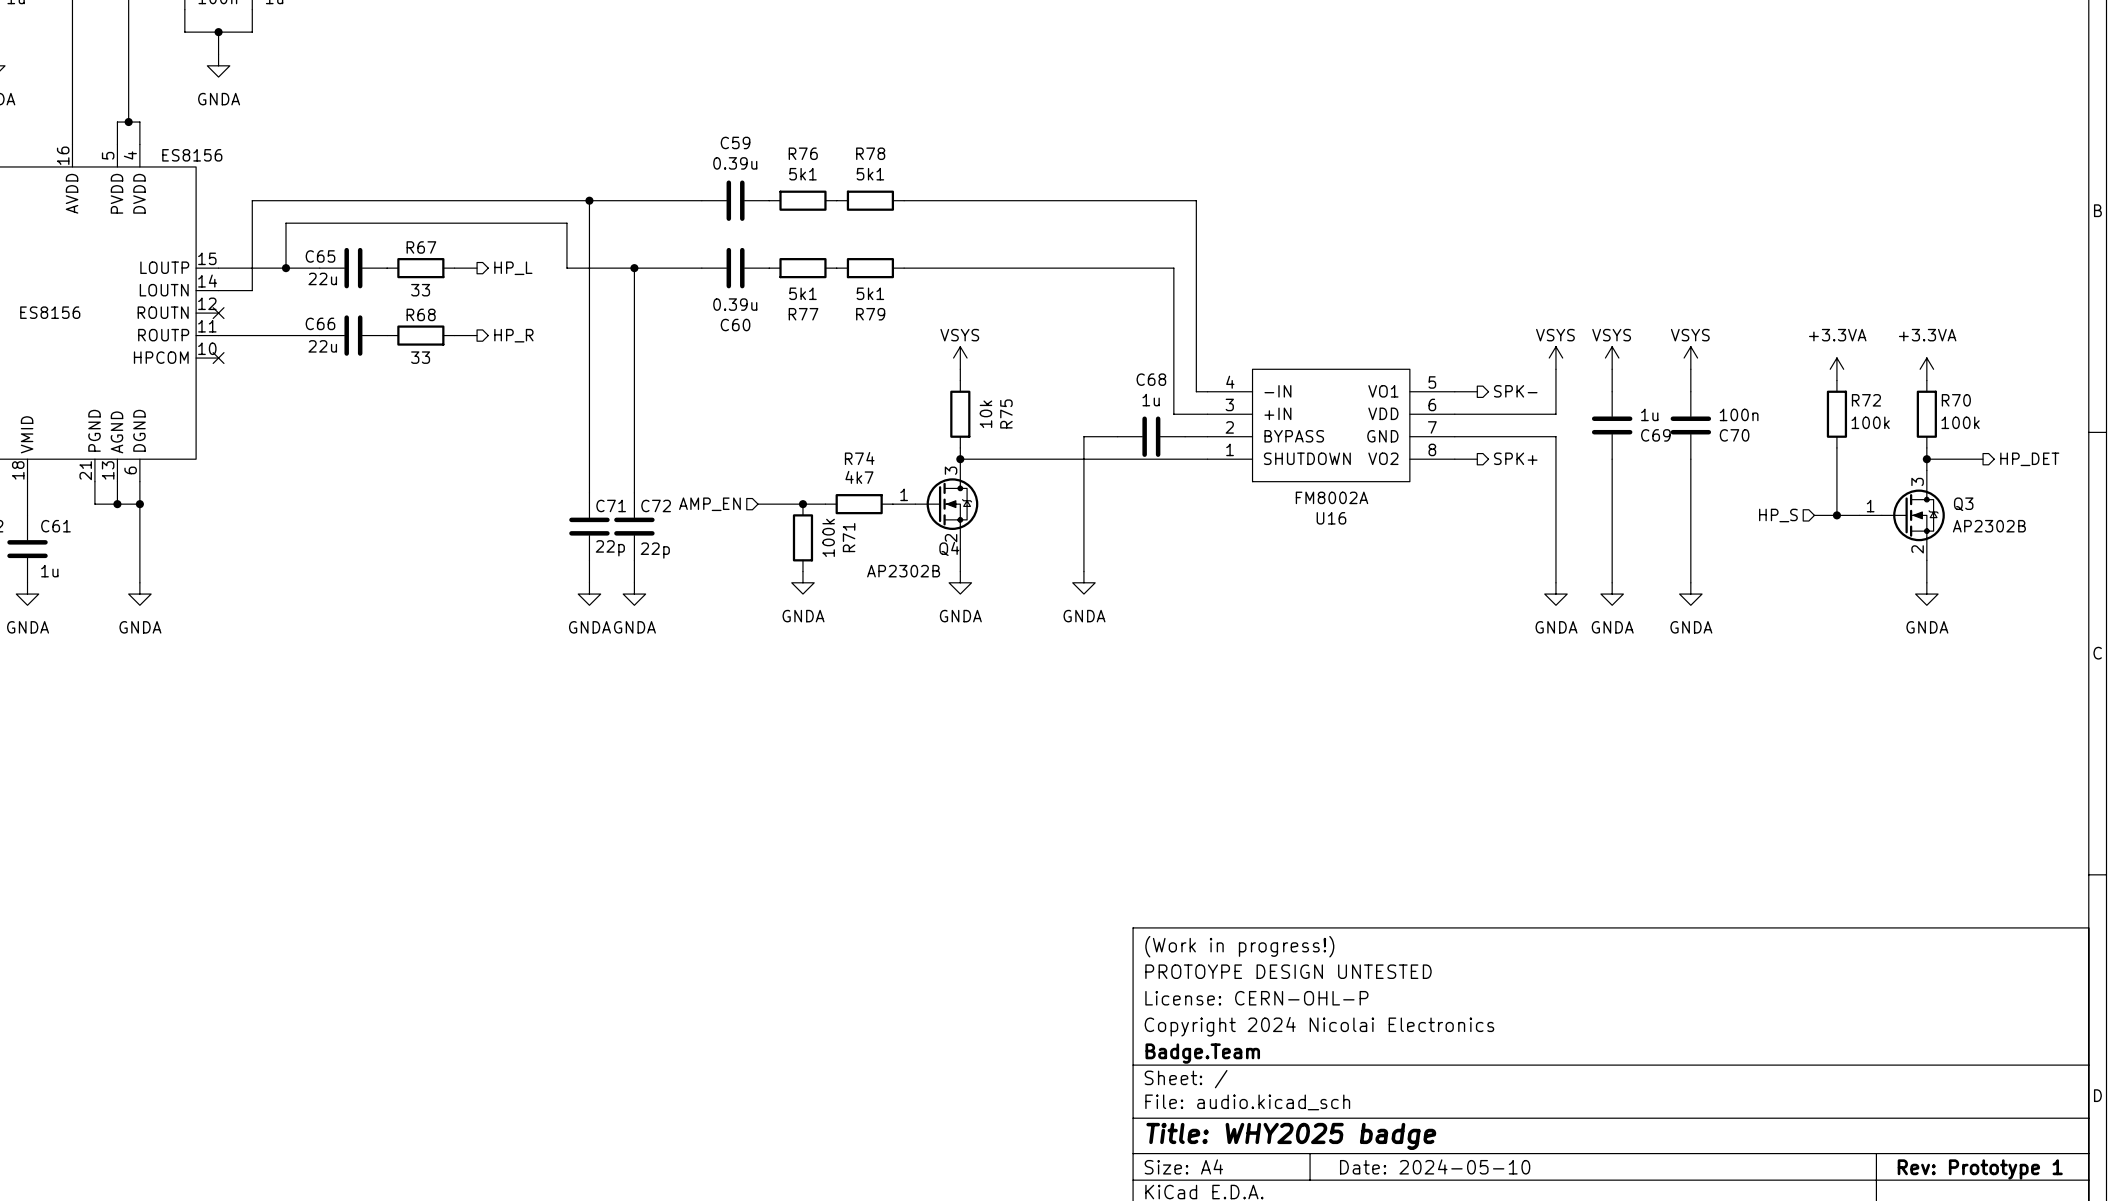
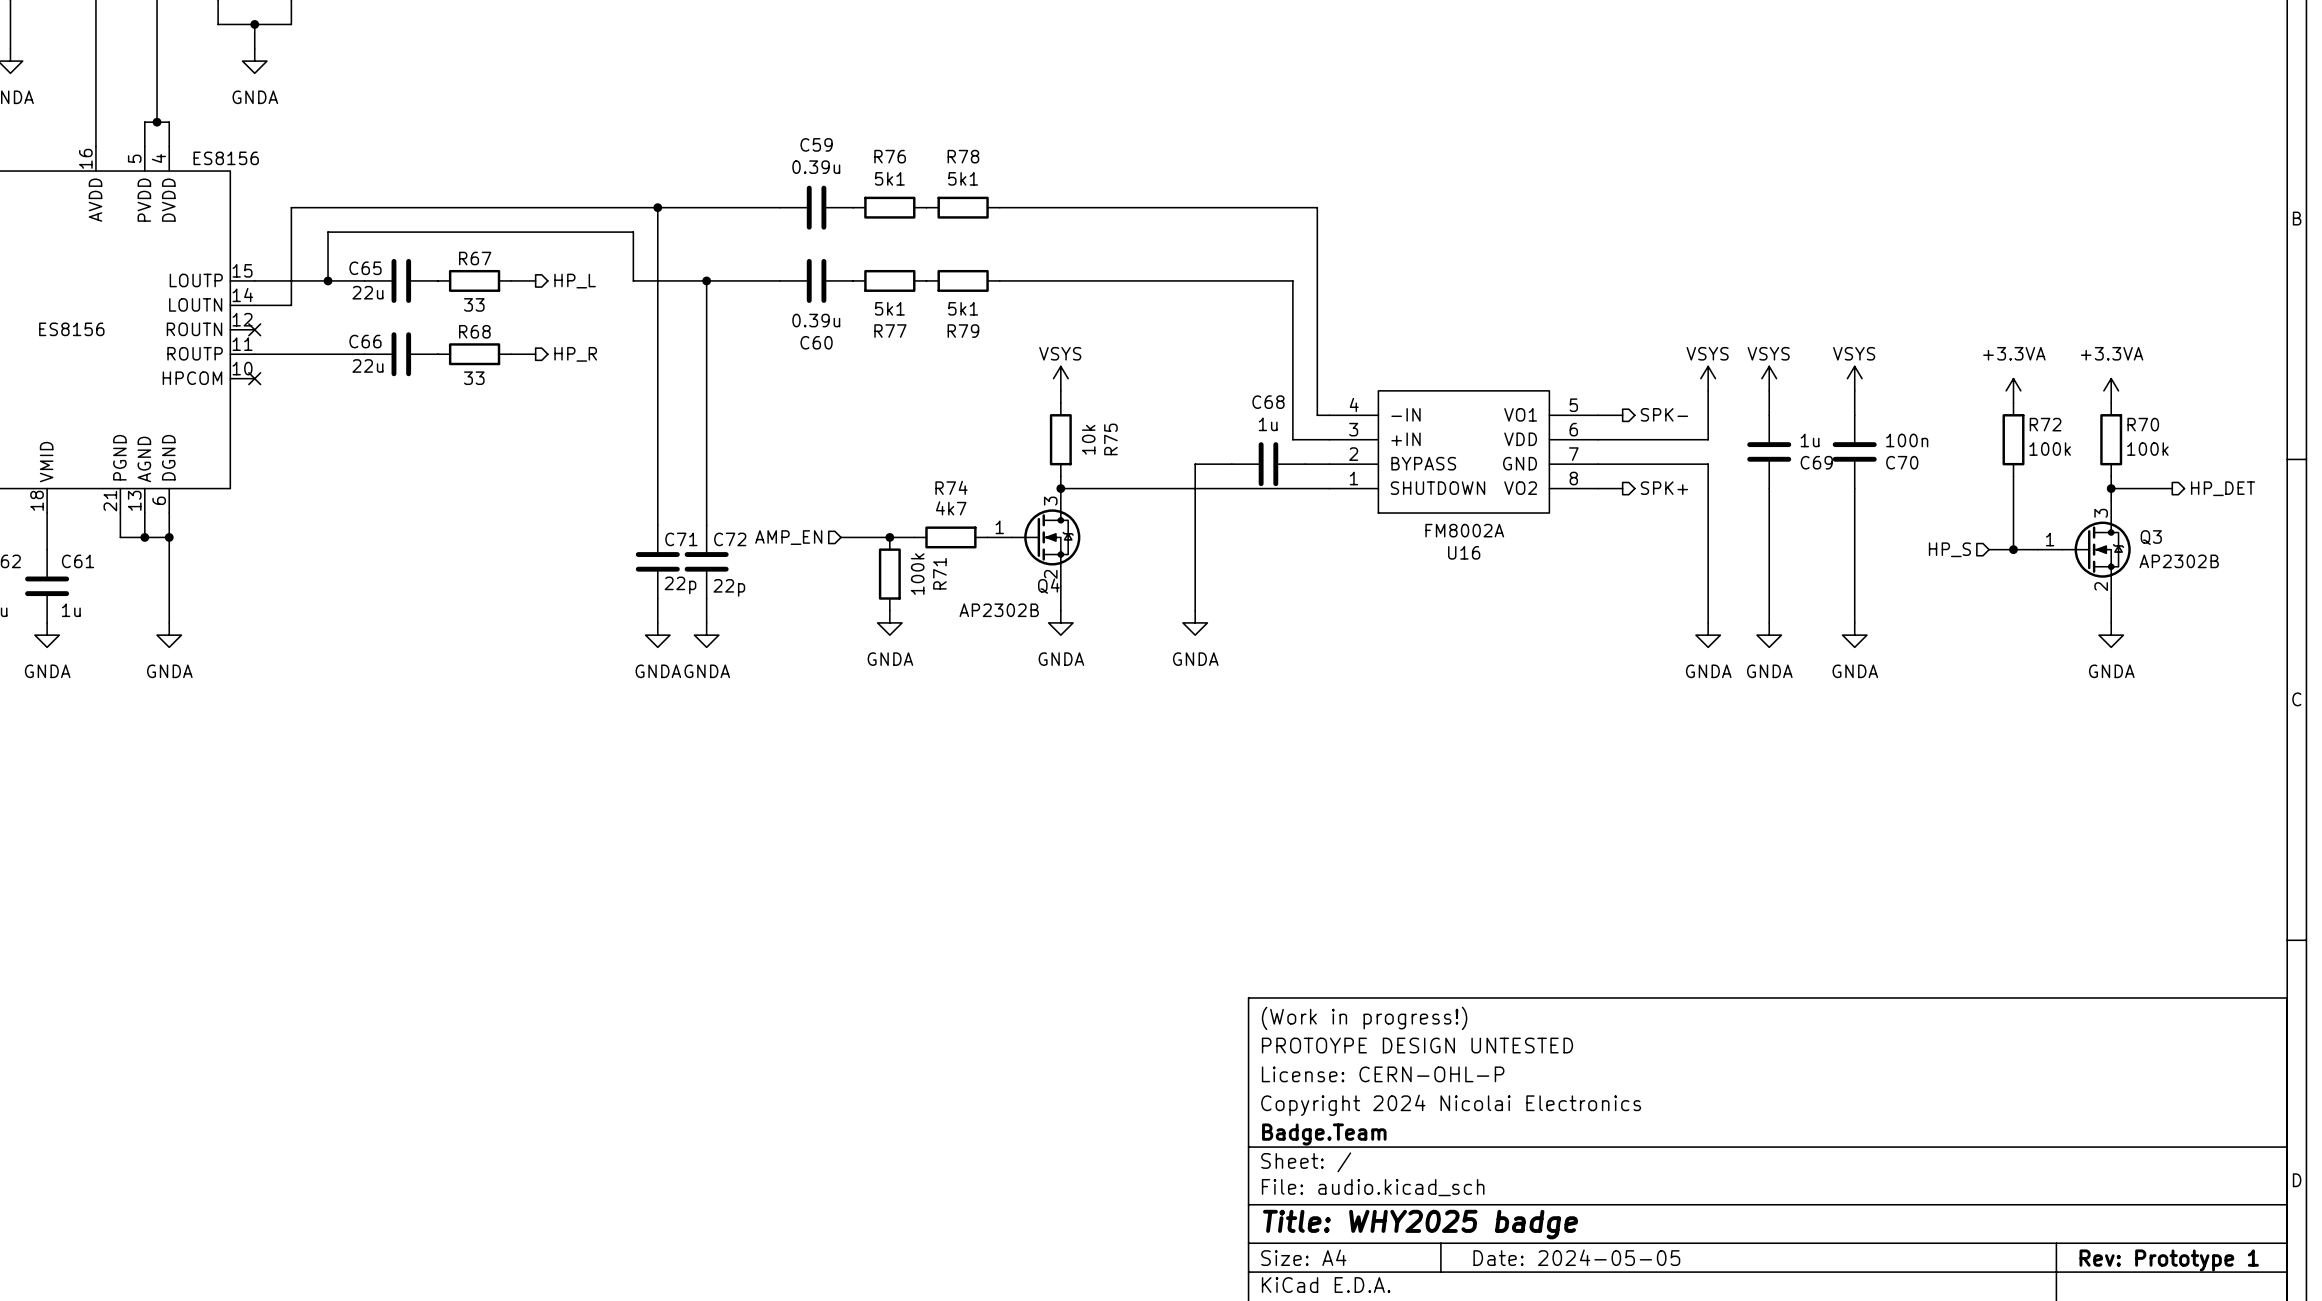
title block: Date: 2024-05-10 (1435, 1166) -> Date: 2024-05-05 (1576, 1257)

